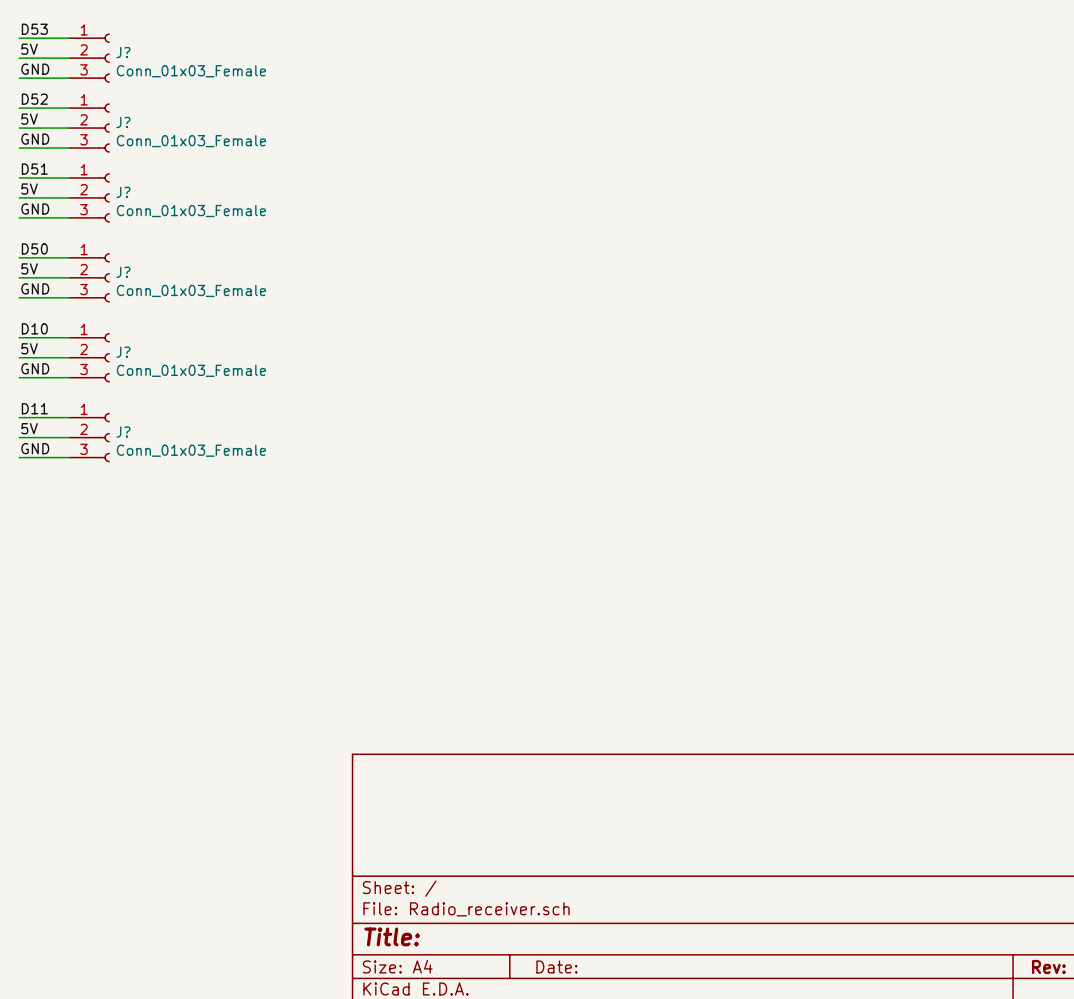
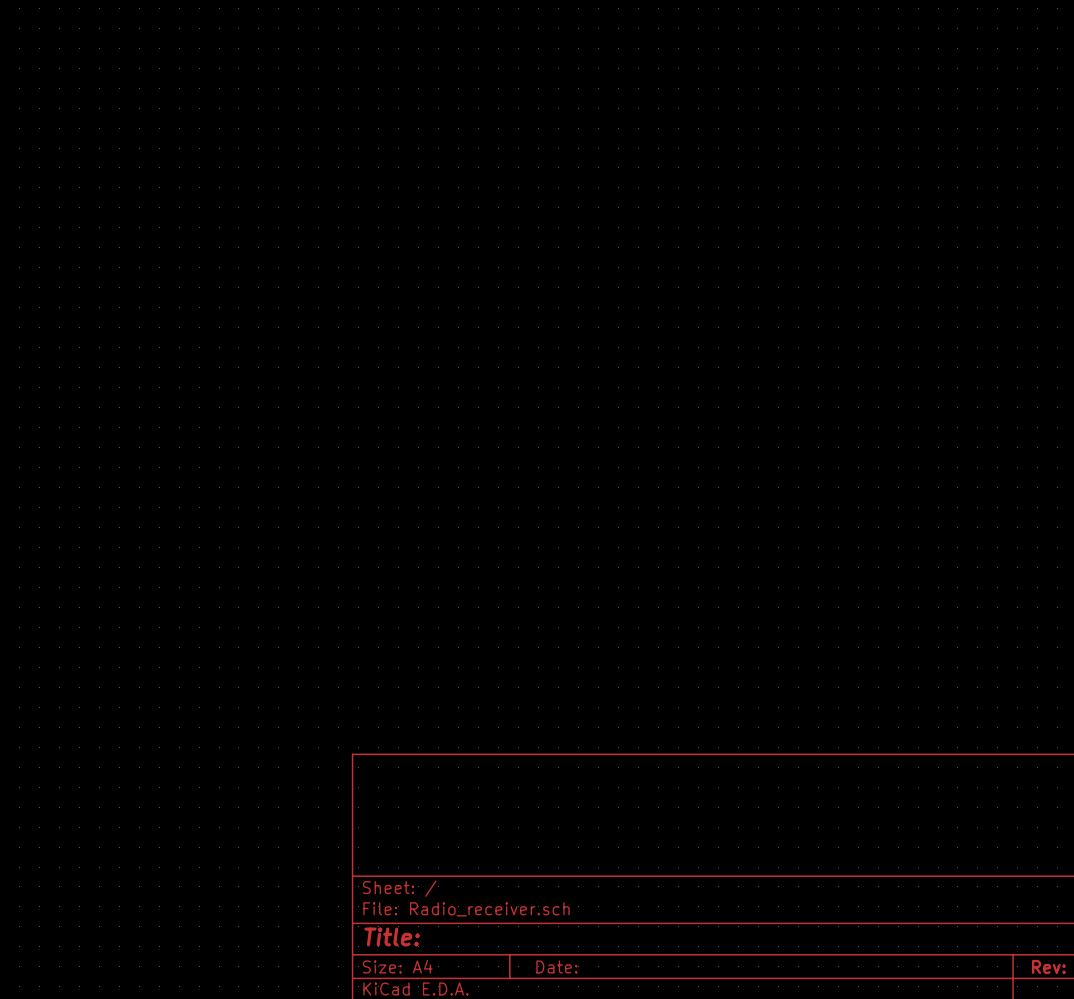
label: D53 (34, 29) -> none
wire: (19, 38) (69, 38) -> none
label: 5V (29, 49) -> none
wire: (19, 58) (69, 58) -> none
J?: Conn_01x03_Female (89, 58) -> none
label: GND (35, 69) -> none
wire: (19, 78) (69, 78) -> none
label: D52 (34, 99) -> none
wire: (19, 108) (69, 108) -> none
label: 5V (29, 119) -> none
wire: (19, 128) (69, 128) -> none
J?: Conn_01x03_Female (89, 128) -> none
label: GND (35, 139) -> none
wire: (19, 148) (69, 148) -> none
label: D51 (34, 169) -> none
wire: (19, 177) (69, 177) -> none
label: 5V (29, 189) -> none
wire: (19, 197) (69, 197) -> none
J?: Conn_01x03_Female (89, 197) -> none
label: GND (35, 209) -> none
wire: (19, 217) (69, 217) -> none
label: D50 (34, 248) -> none
wire: (19, 257) (69, 257) -> none
label: 5V (29, 268) -> none
wire: (19, 277) (69, 277) -> none
J?: Conn_01x03_Female (89, 277) -> none
label: GND (35, 288) -> none
wire: (19, 297) (69, 297) -> none
label: D10 (34, 328) -> none
wire: (19, 337) (69, 337) -> none
label: 5V (29, 348) -> none
wire: (19, 357) (69, 357) -> none
J?: Conn_01x03_Female (89, 357) -> none
label: GND (35, 368) -> none
wire: (19, 377) (69, 377) -> none
label: D11 (34, 408) -> none
wire: (19, 417) (69, 417) -> none
label: 5V (29, 428) -> none
wire: (19, 437) (69, 437) -> none
J?: Conn_01x03_Female (89, 437) -> none
label: GND (35, 448) -> none
wire: (19, 457) (69, 457) -> none

